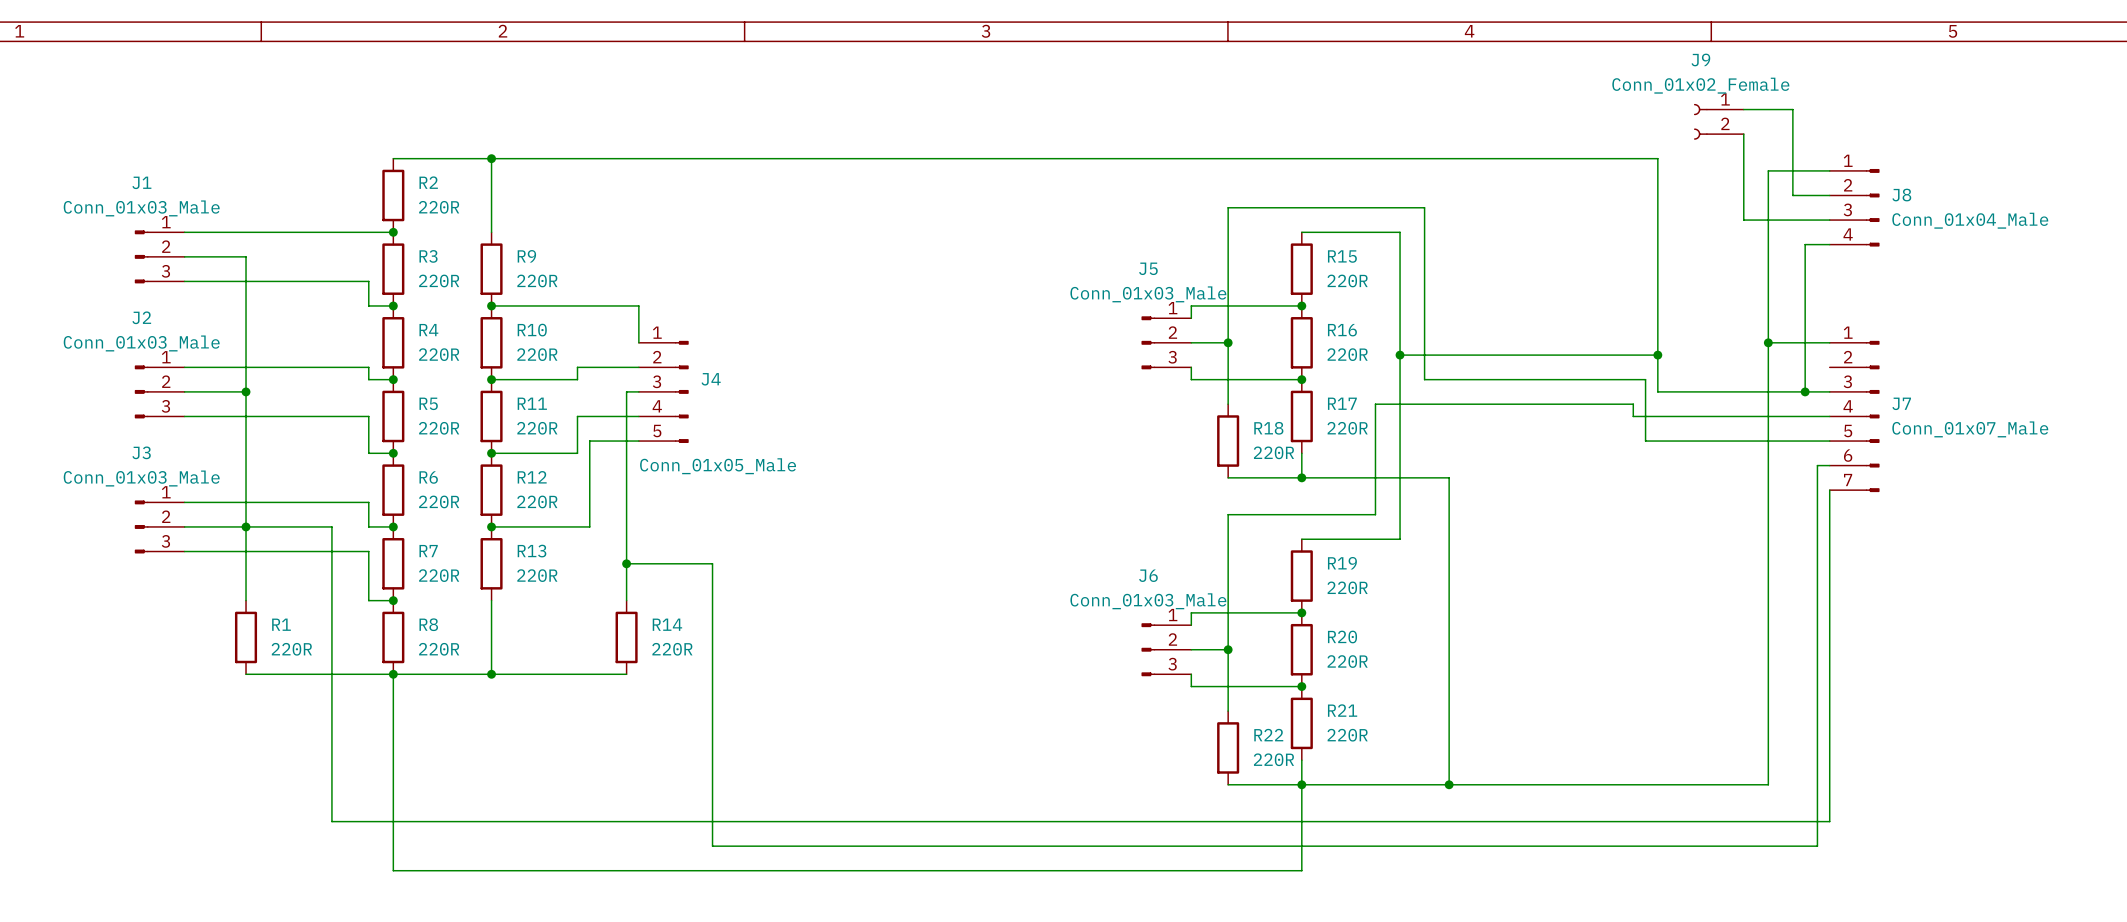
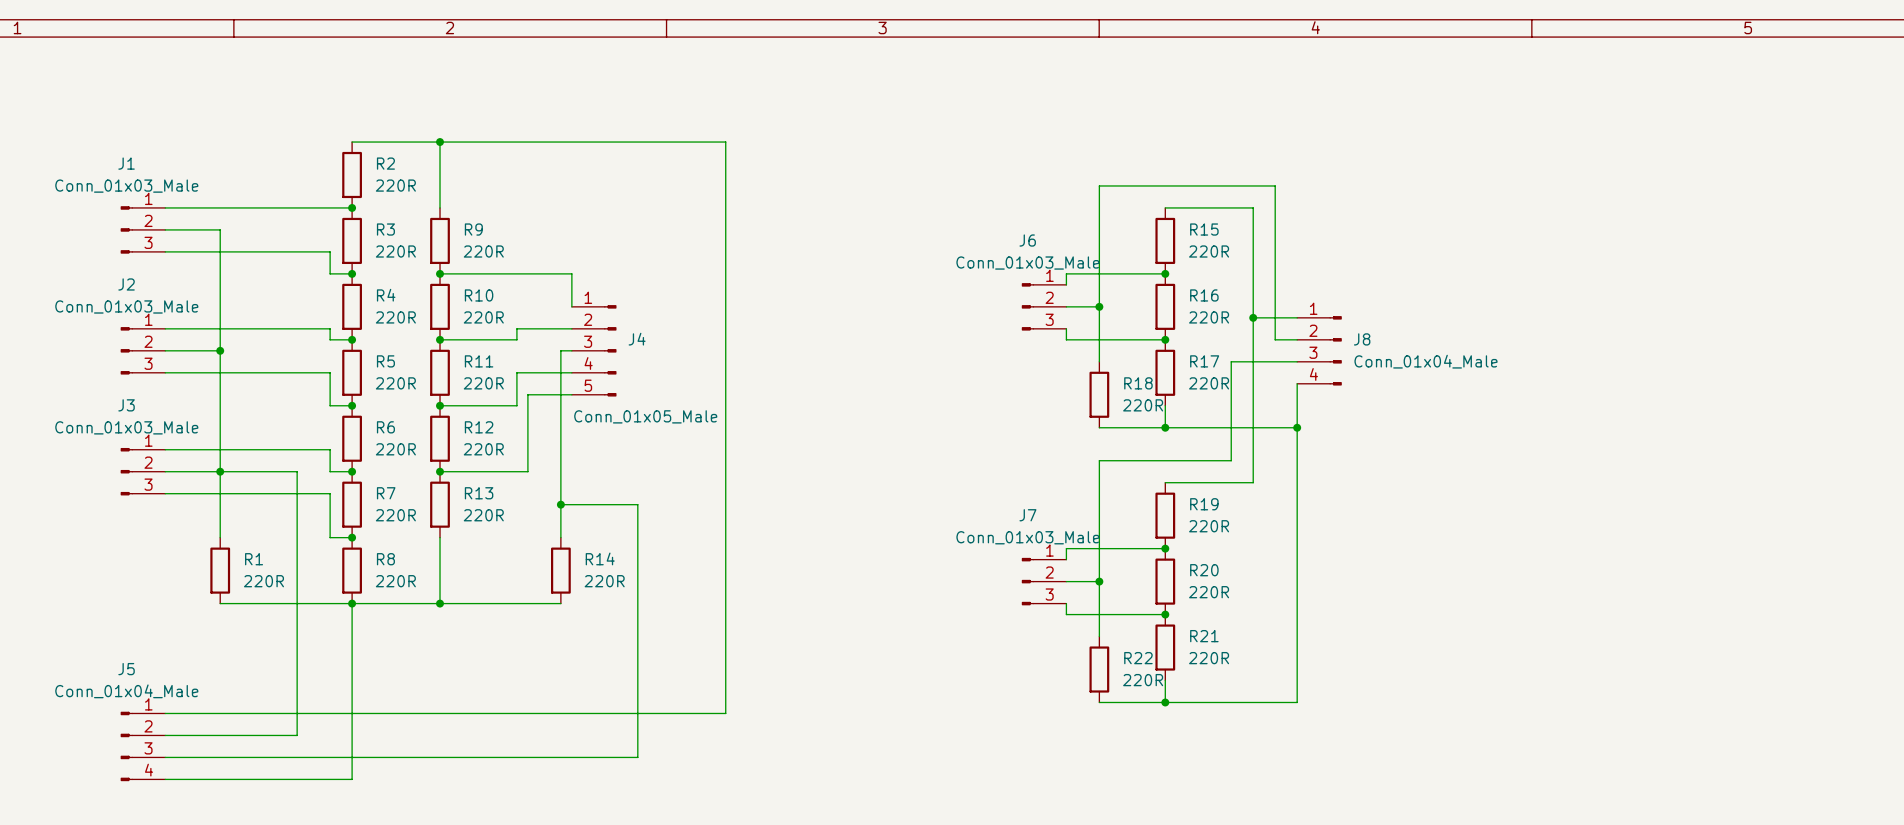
wire: (1743, 109) (1792, 109) (1792, 195) (1829, 195) -> none
J9: Conn_01x02_Female (1718, 121) -> none
wire: (1743, 134) (1743, 220) (1829, 220) -> none
wire: (810, 158) (1657, 158) (1657, 391) (1829, 391) -> (725, 142) (725, 713) (165, 713)
wire: (1829, 170) (1768, 170) (1768, 784) (1449, 784) -> none
J8 position: (1854, 207) -> (1319, 350)
wire: (1829, 244) (1805, 244) (1805, 391) -> none
J5 name: J5 (1148, 268) -> J6 (1027, 240)
wire: (1768, 342) (1829, 342) -> none
junction: (1768, 342) -> none
wire: (1449, 355) (1657, 355) -> none
junction: (1657, 355) -> none
wire: (1449, 379) (1645, 379) (1645, 441) (1829, 441) -> none
junction: (1805, 391) -> none
wire: (1449, 404) (1633, 404) (1633, 416) (1829, 416) -> none
J7: Conn_01x07_Male (1854, 416) -> none
wire: none -> (1297, 383) (1297, 427)
wire: (1829, 465) (1817, 465) (1817, 846) (712, 846) -> (165, 757) (637, 757)
junction: none -> (1297, 427)
wire: (1829, 490) (1829, 821) (331, 821) -> (165, 735) (297, 735)
J6 name: J6 (1148, 575) -> J7 (1027, 515)
wire: (1301, 784) (1301, 870) (393, 870) -> (165, 779) (352, 779)
junction: (1449, 784) -> none
J5: none -> Conn_01x04_Male (142, 746)

